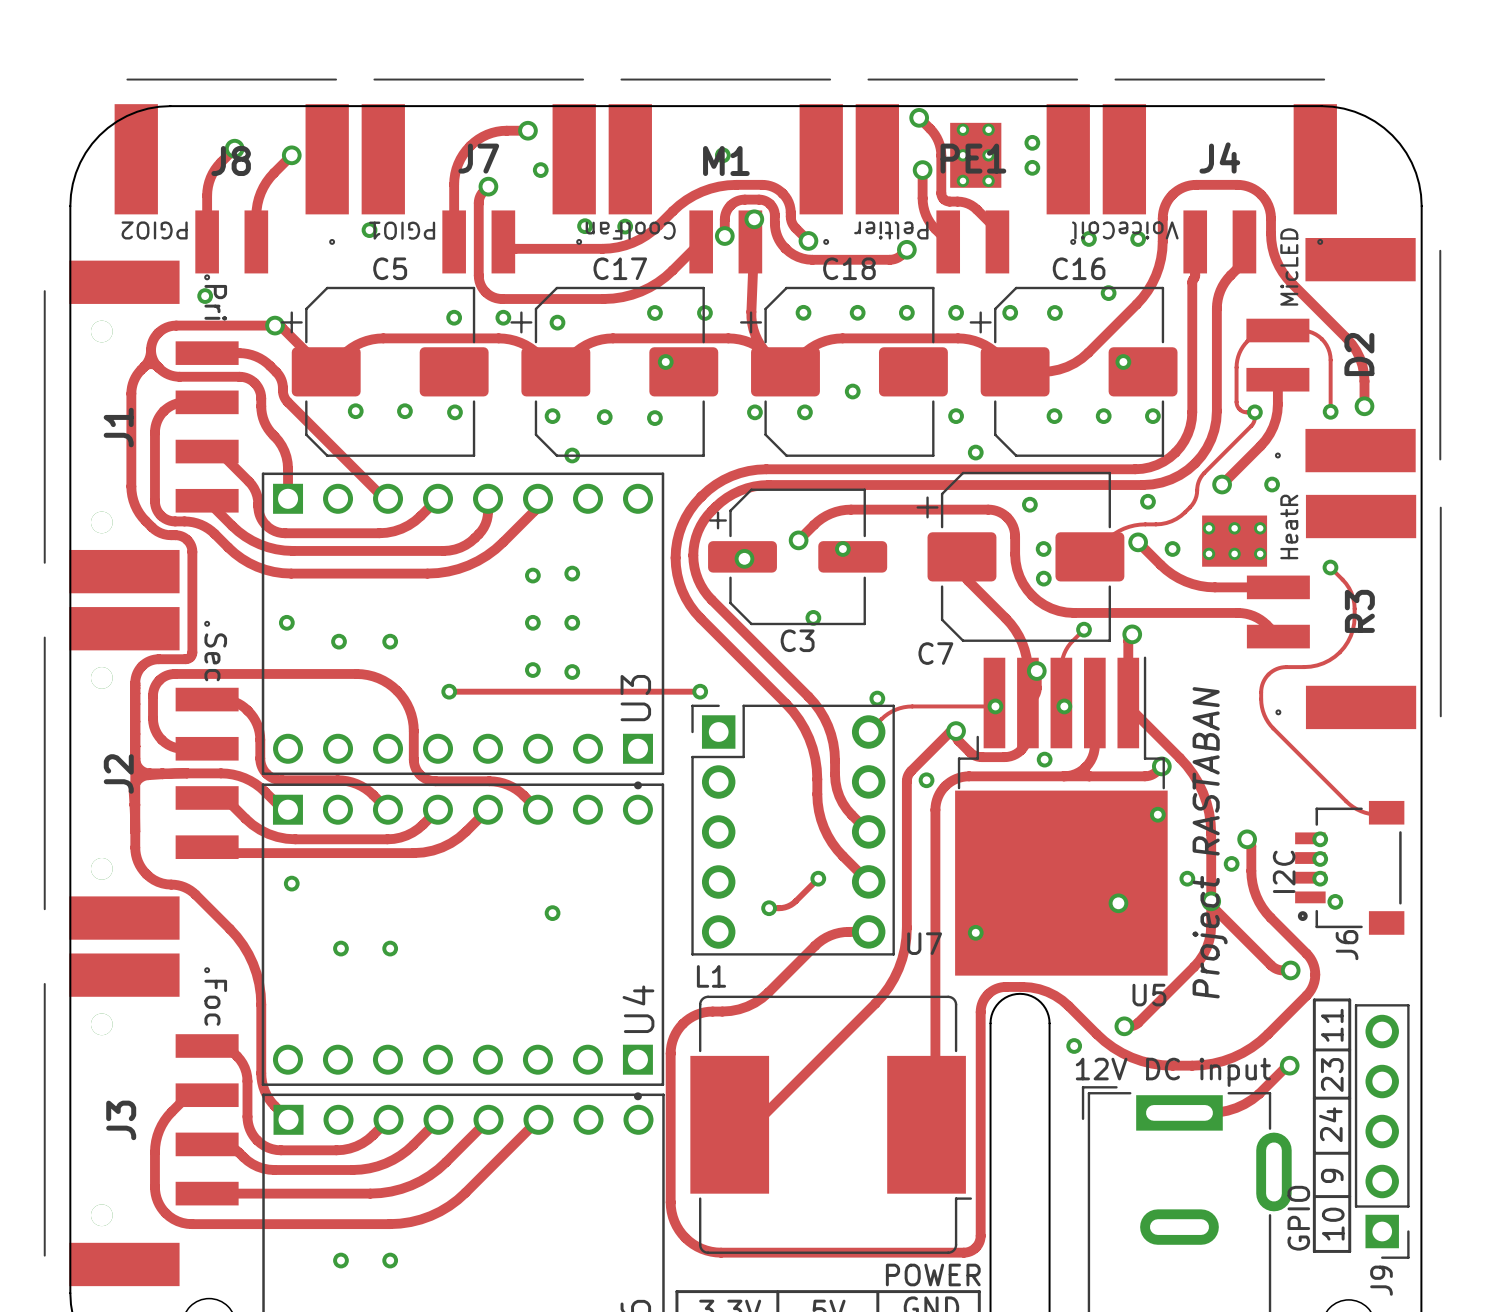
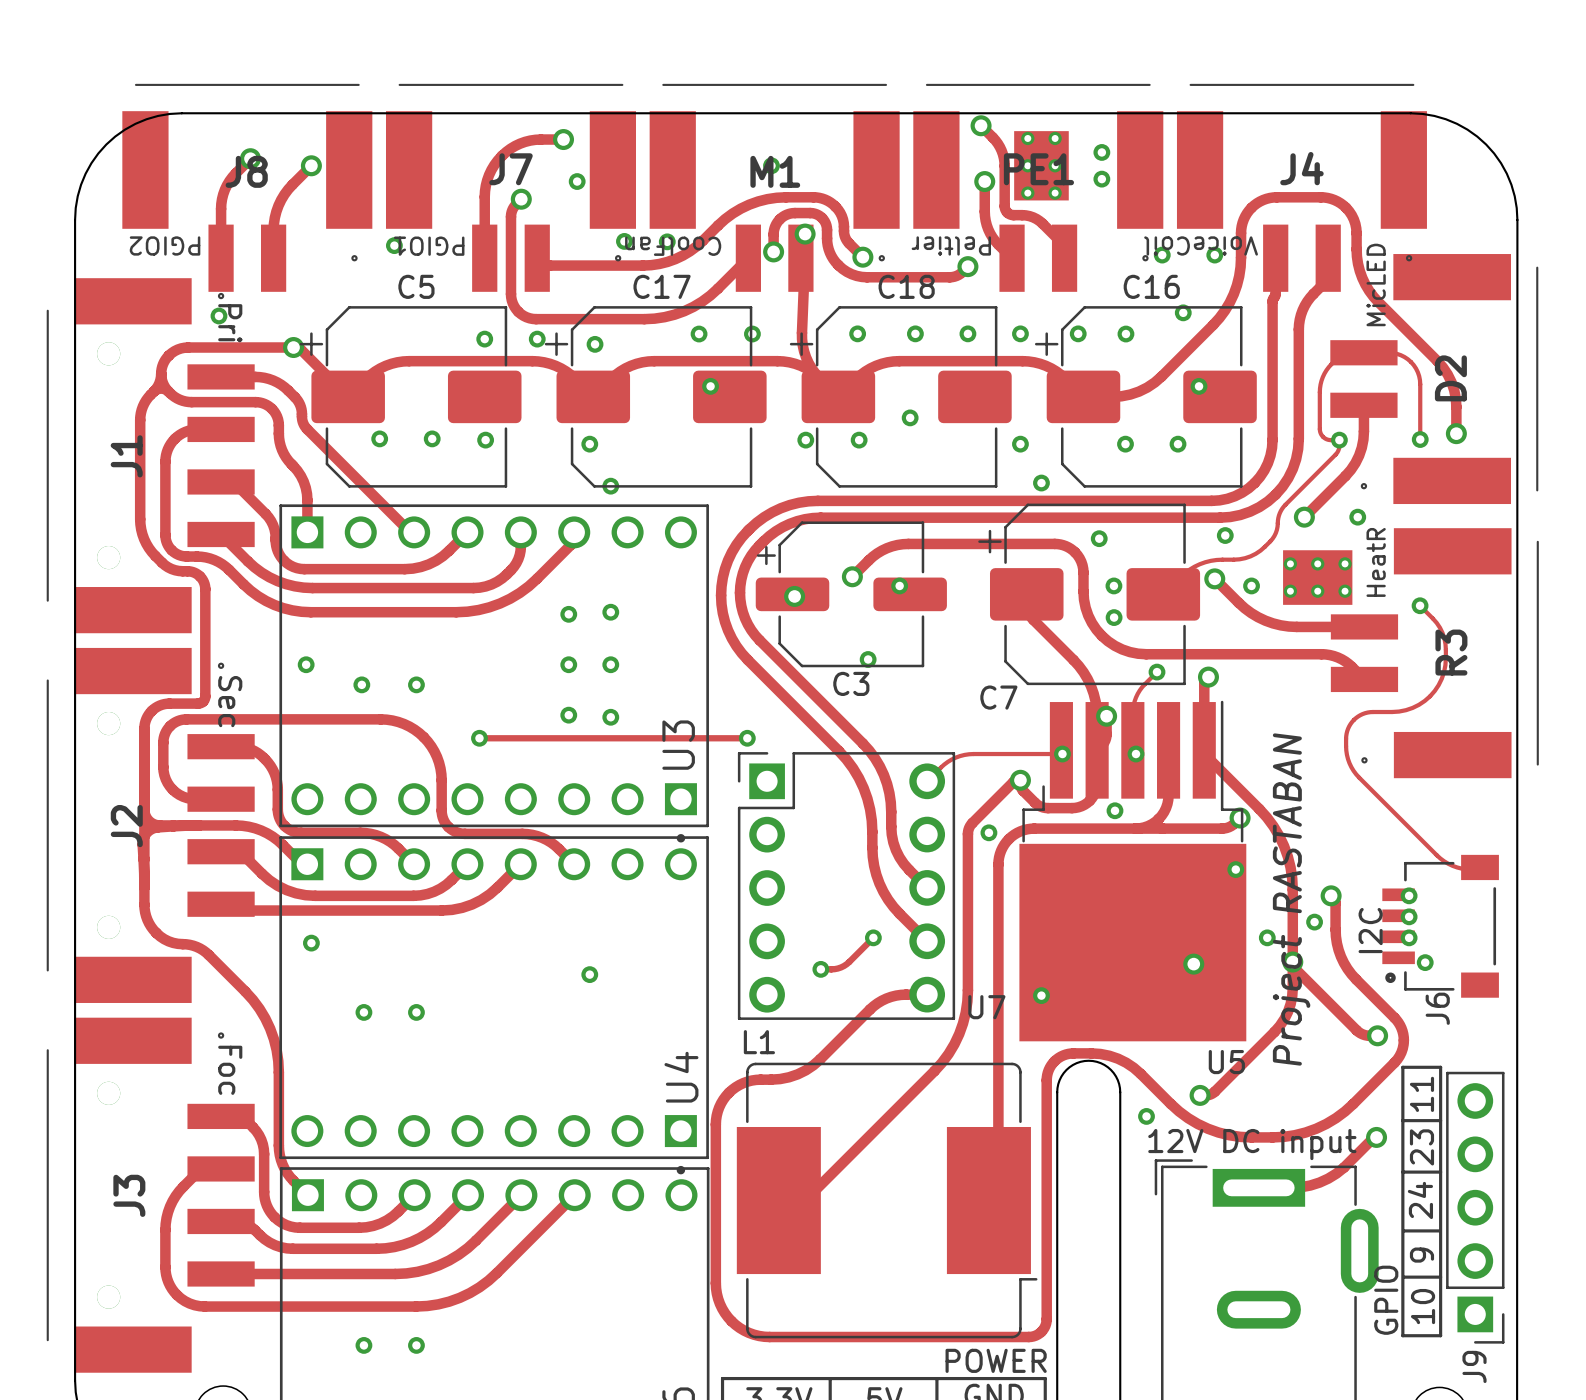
via: (1152, 416) -> none
via: (604, 417) -> none
via: (654, 418) -> none
via: (877, 698) -> none

